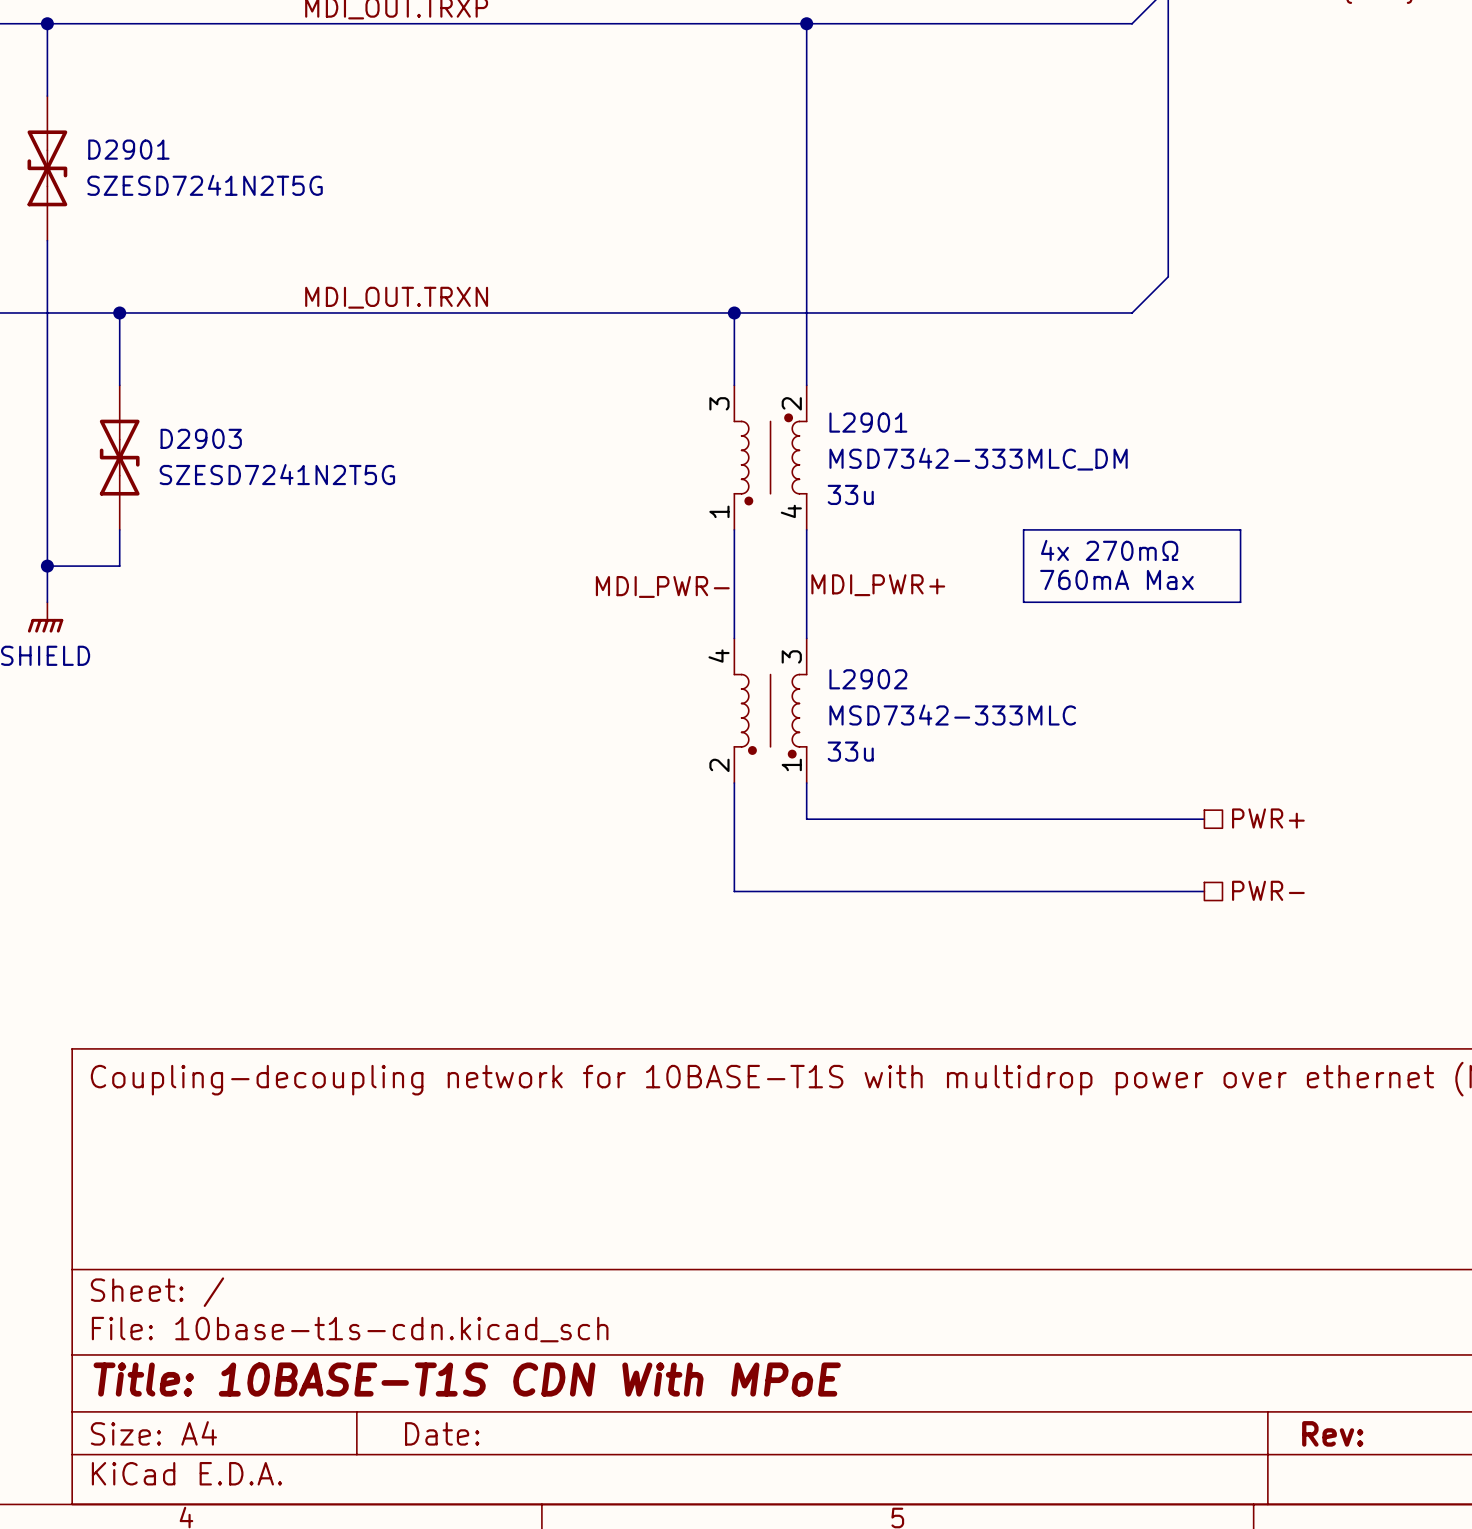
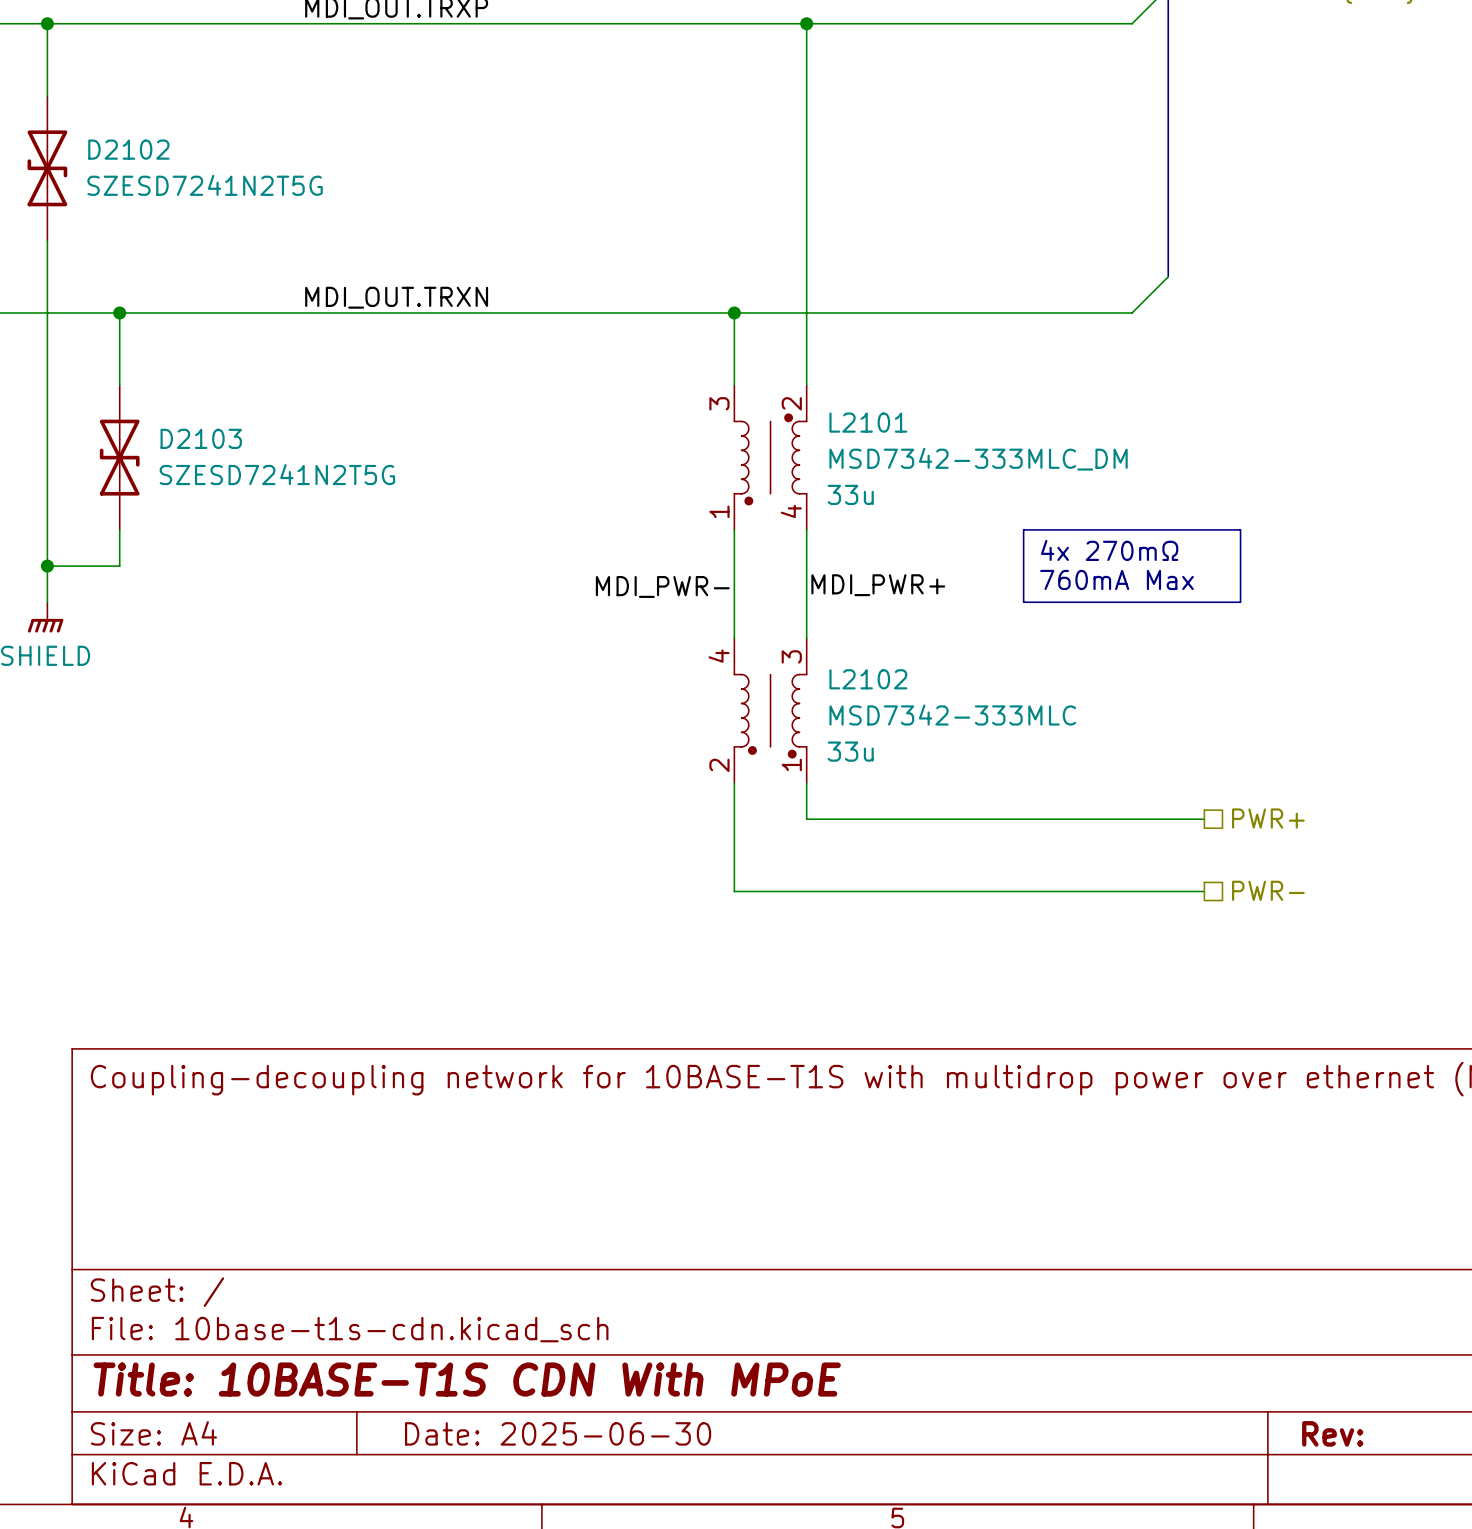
D2901 name: D2901 (128, 149) -> D2102 (128, 149)
L2901 name: L2901 (868, 422) -> L2101 (868, 422)
D2903 name: D2903 (201, 438) -> D2103 (201, 438)
L2902 name: L2902 (868, 679) -> L2102 (868, 679)
title block: Date: (442, 1433) -> Date: 2025-06-30 (558, 1433)

